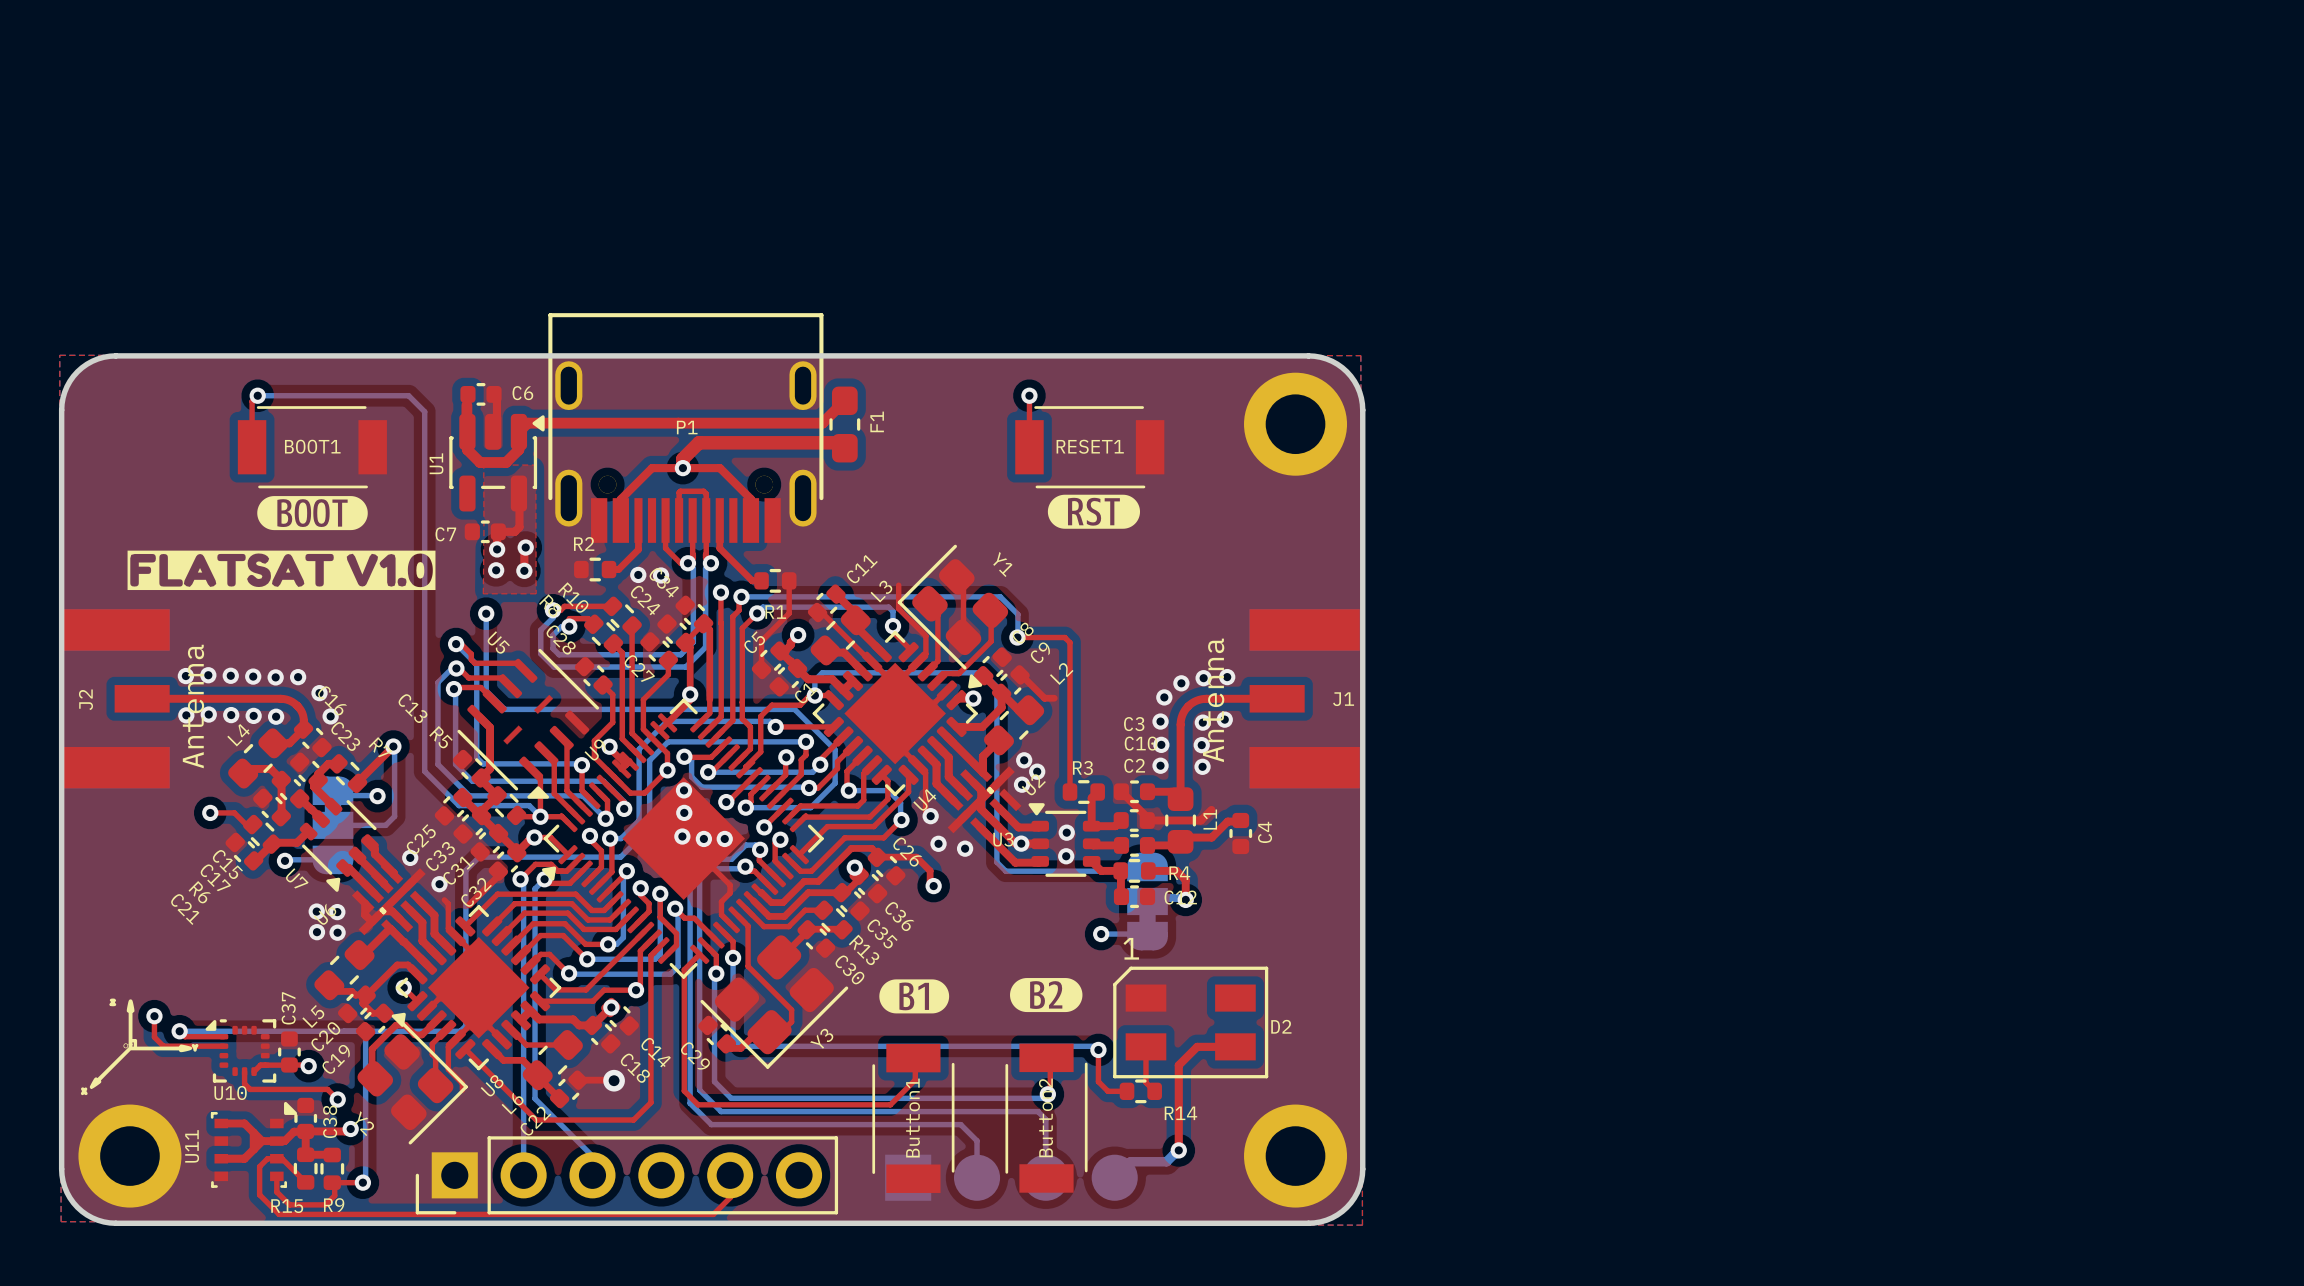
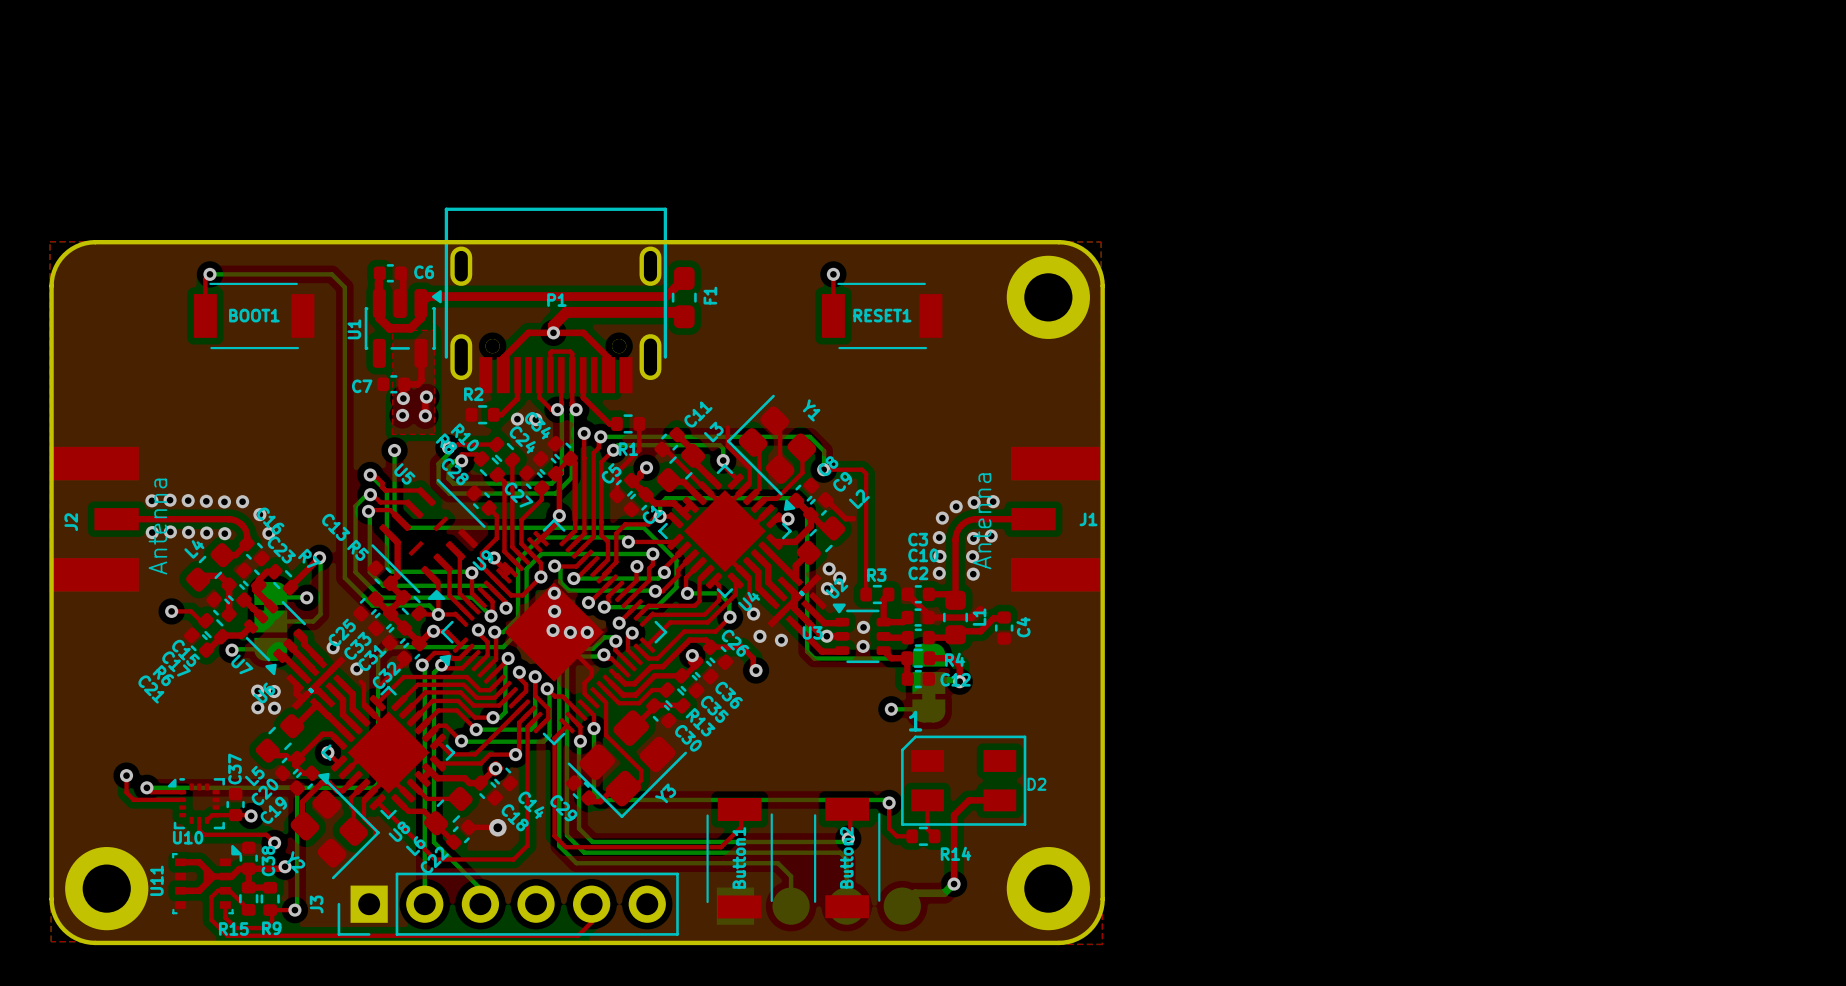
drawing: [1047, 494, 1141, 529] -> none
drawing: [127, 496, 436, 591] -> none
drawing: [1010, 978, 1083, 1013] -> none
drawing: [879, 979, 950, 1014] -> none
drawing: [80, 998, 199, 1096] -> none
J3 name: none -> J3 (316, 904)

